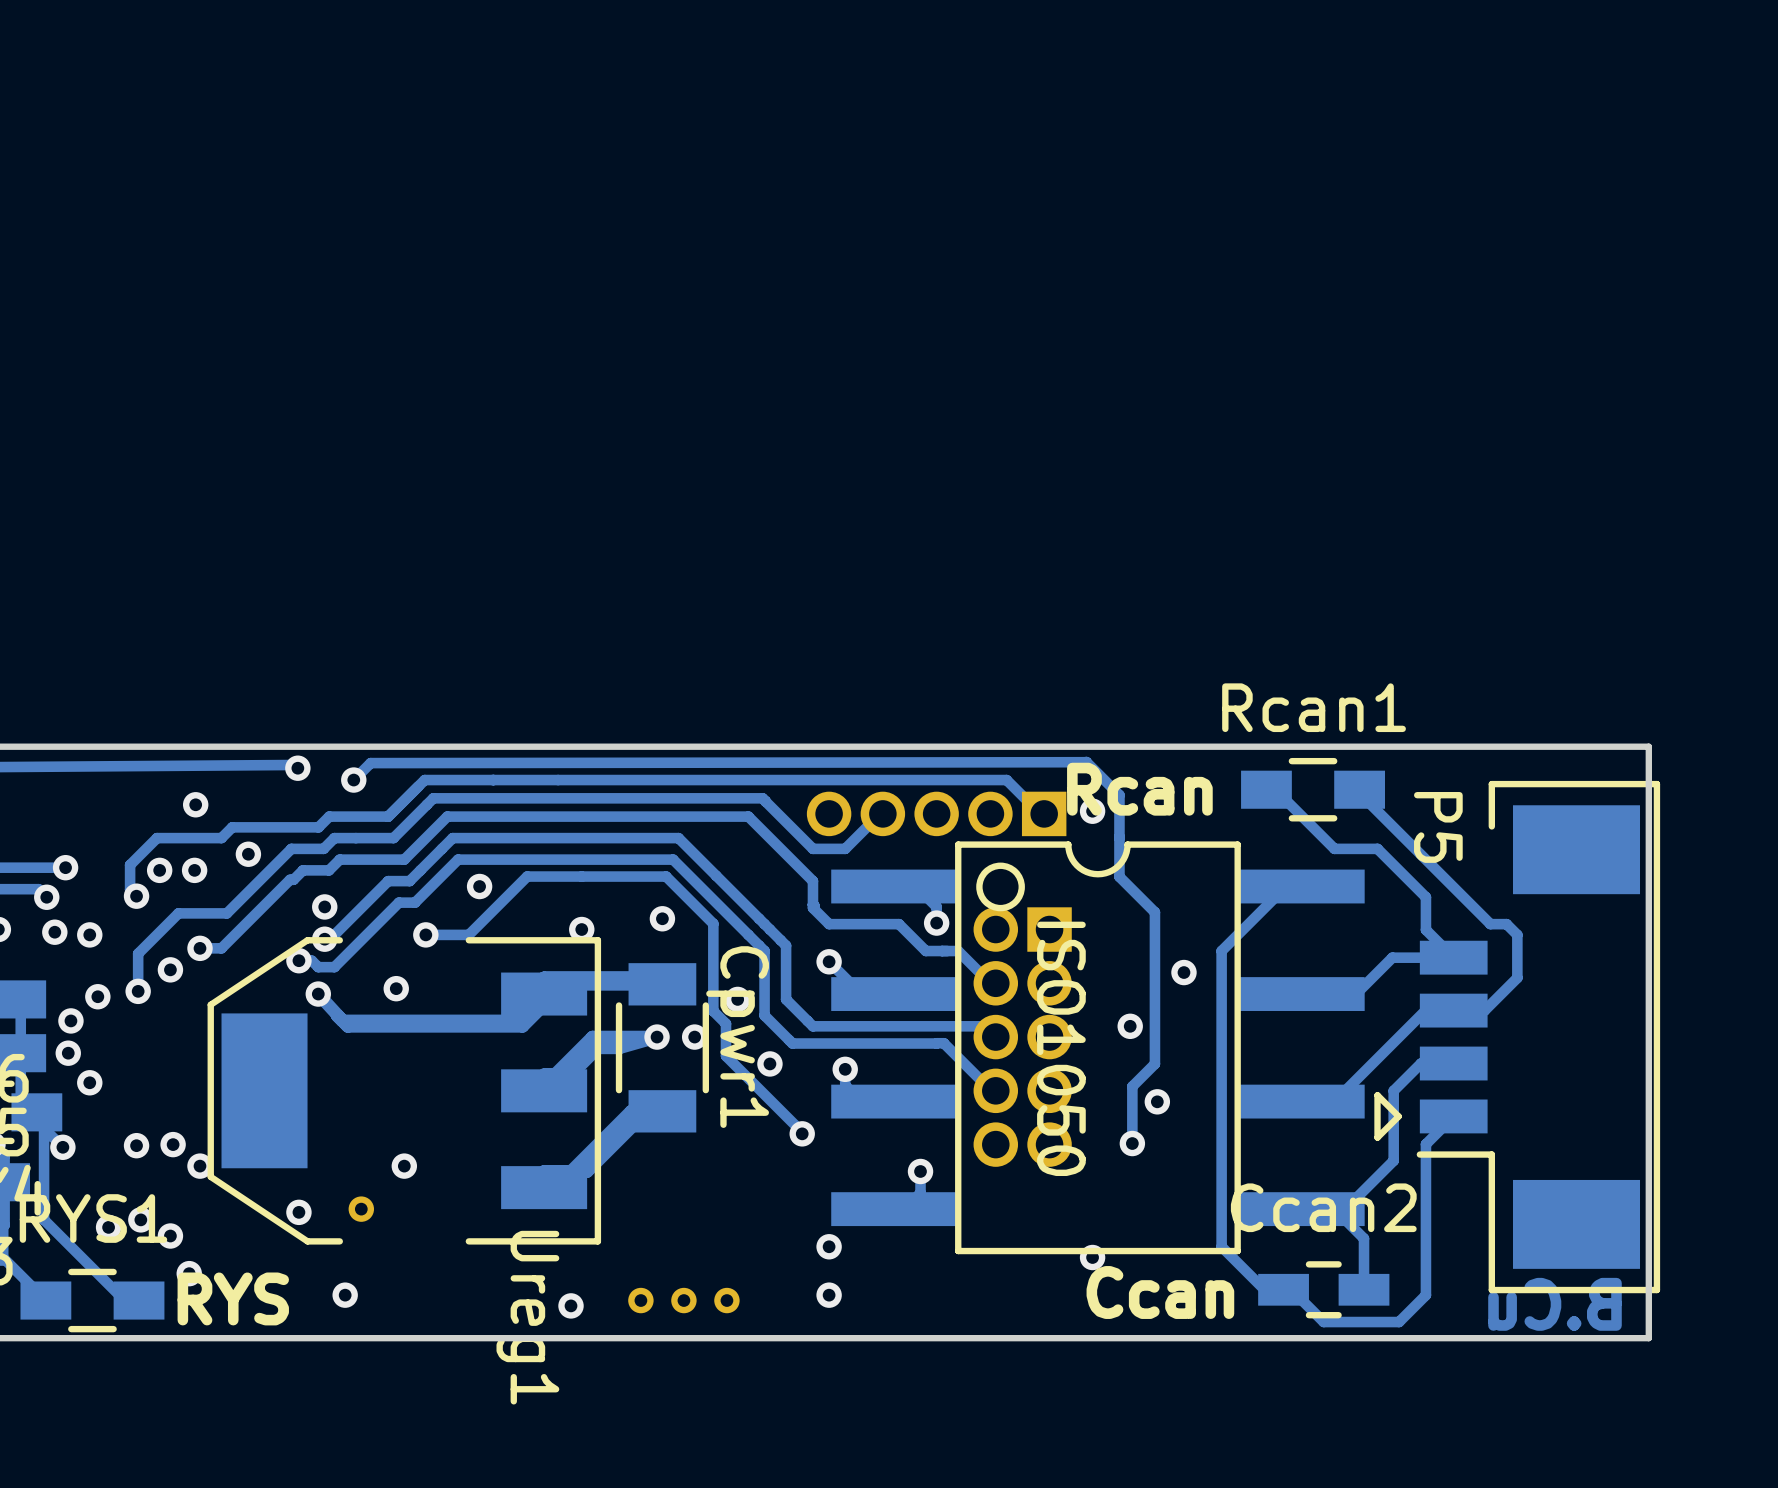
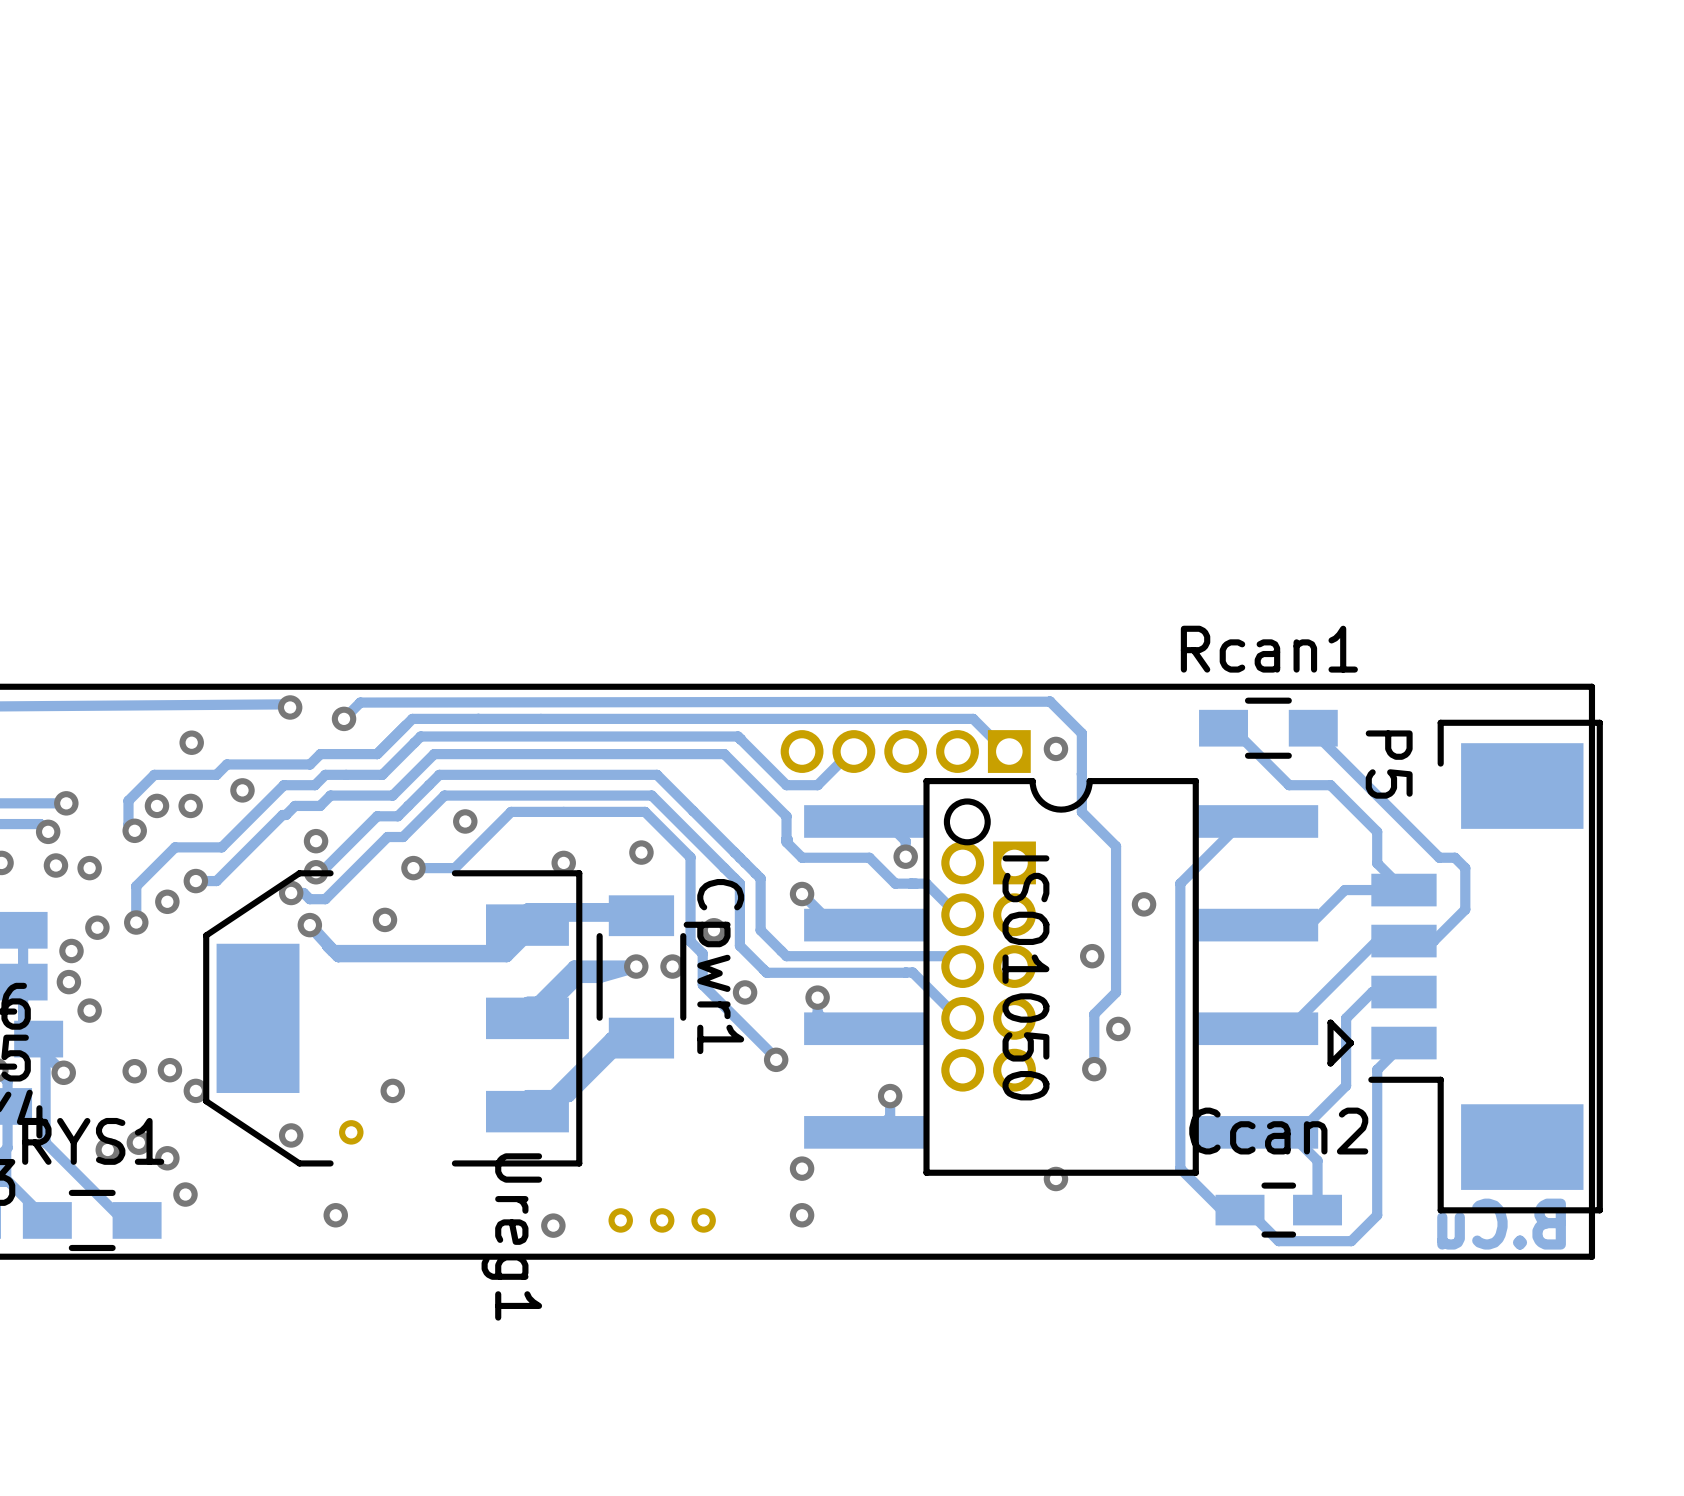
text: Rcan (1139, 789) -> none
text: Ccan (1160, 1292) -> none
text: RYS (233, 1298) -> none

